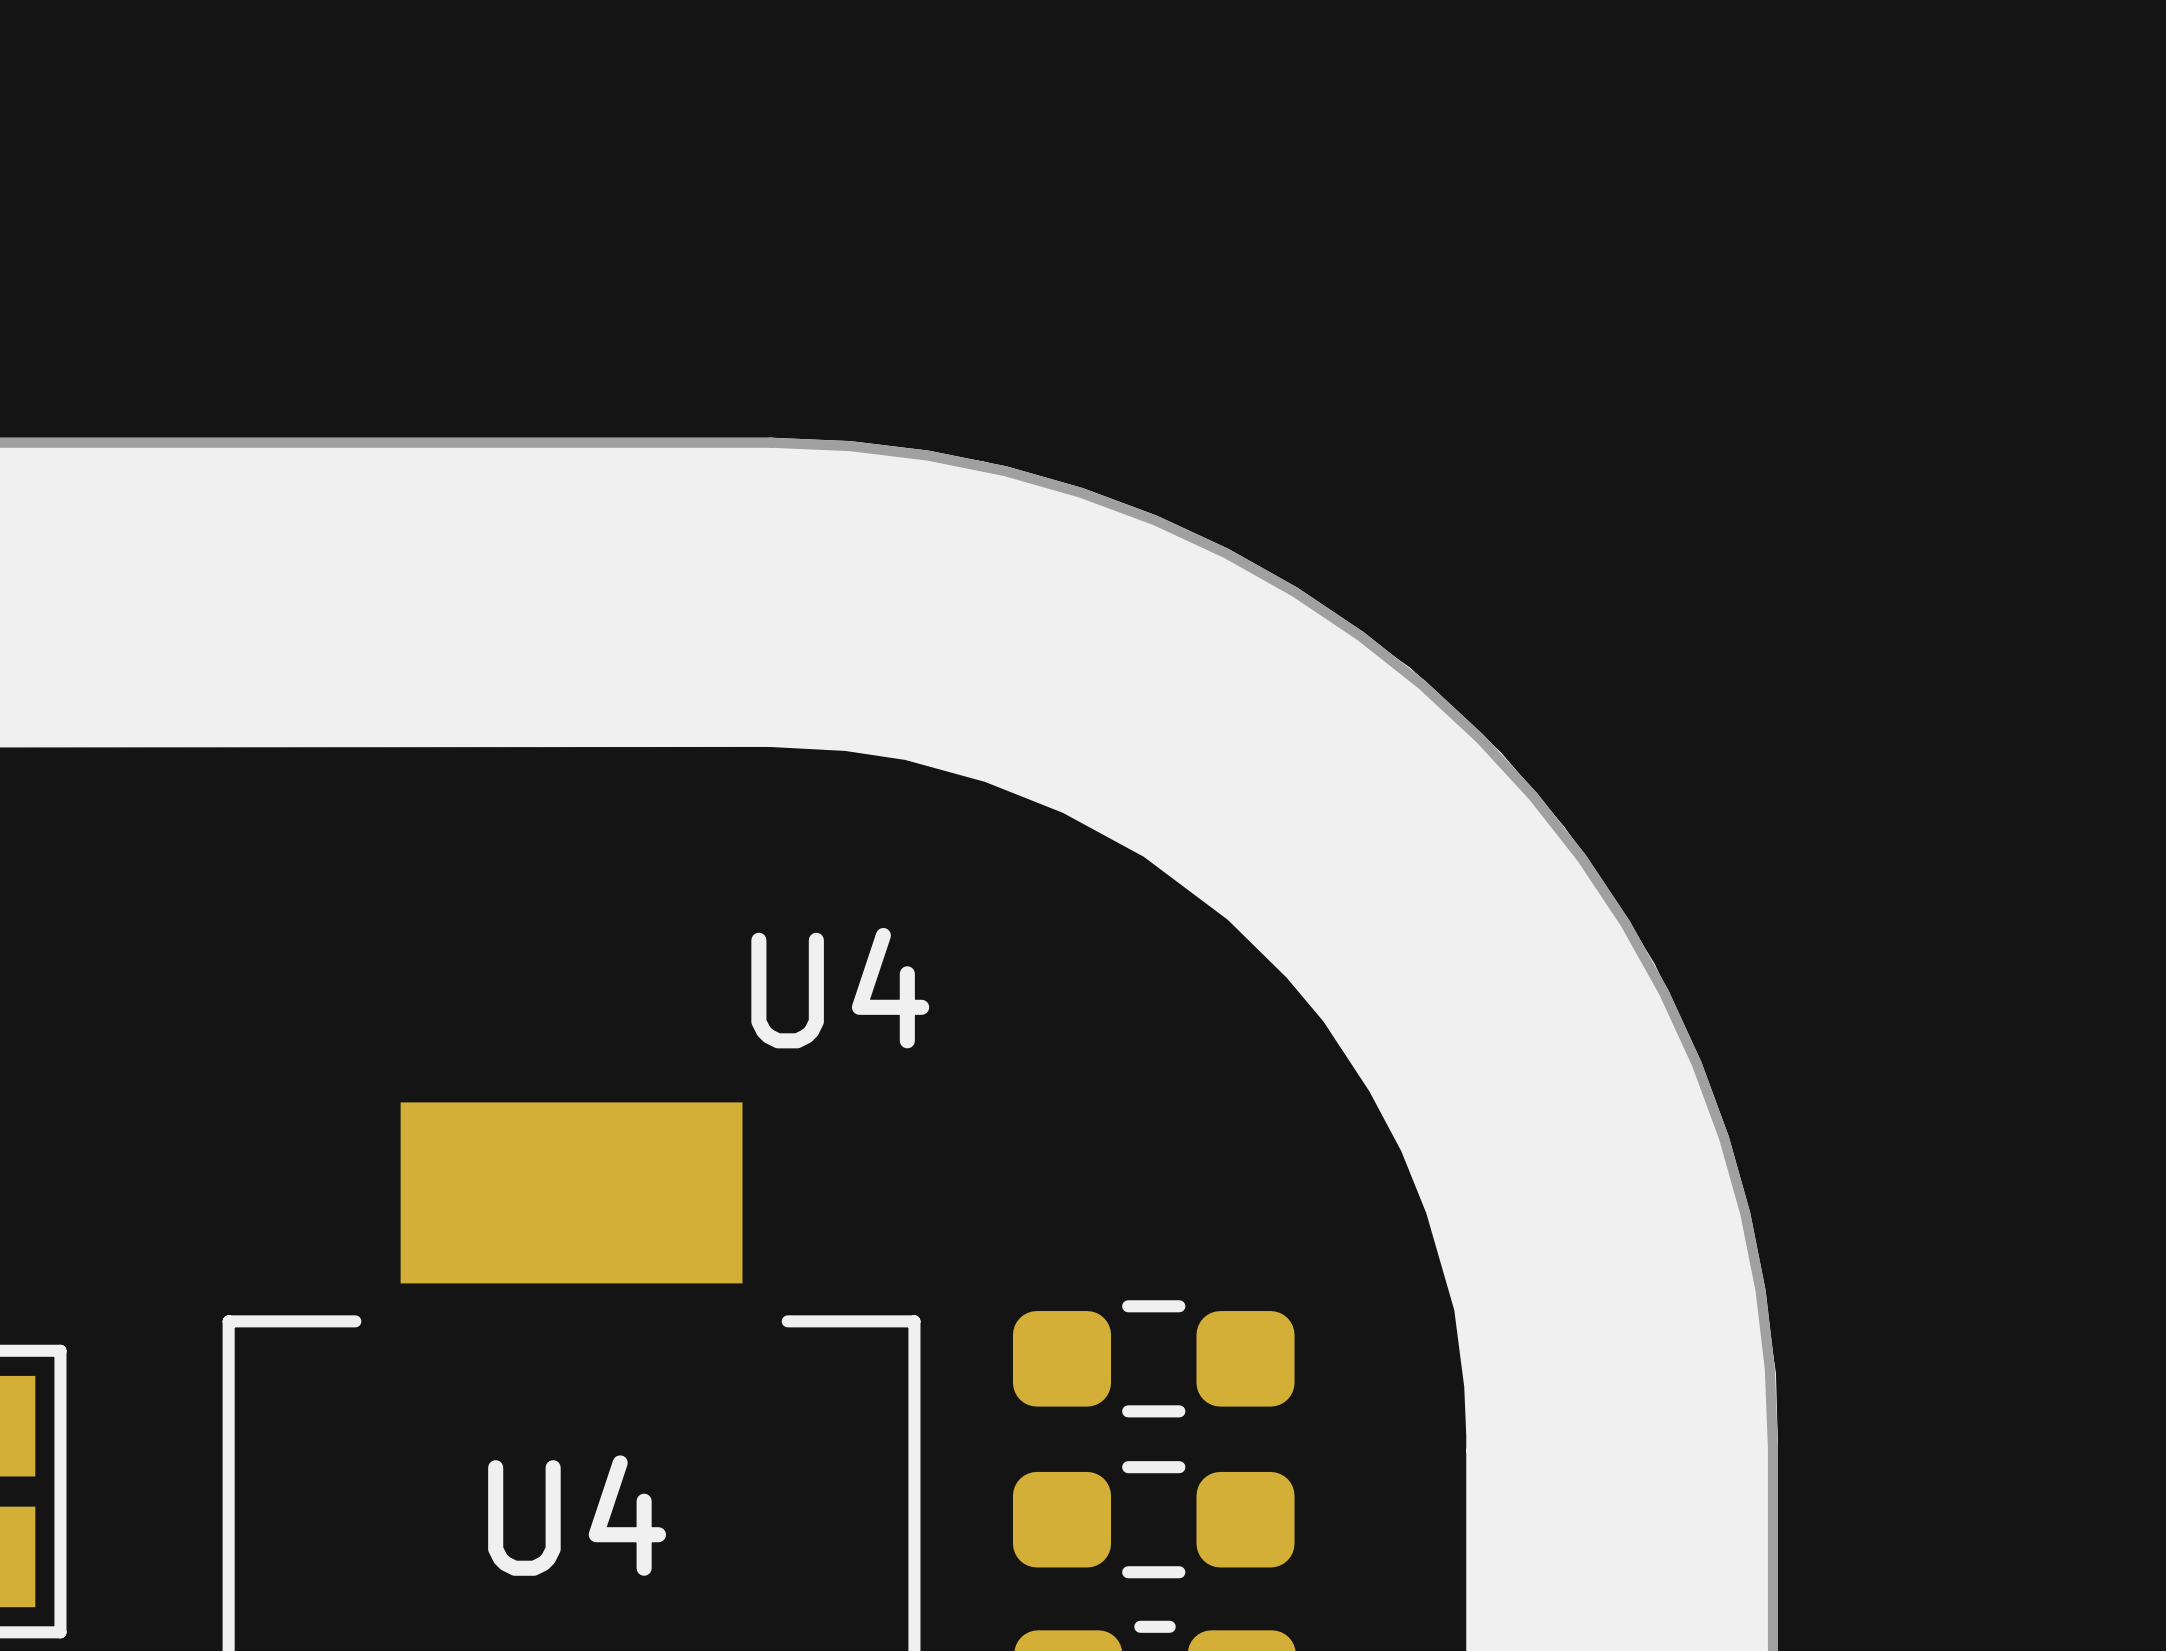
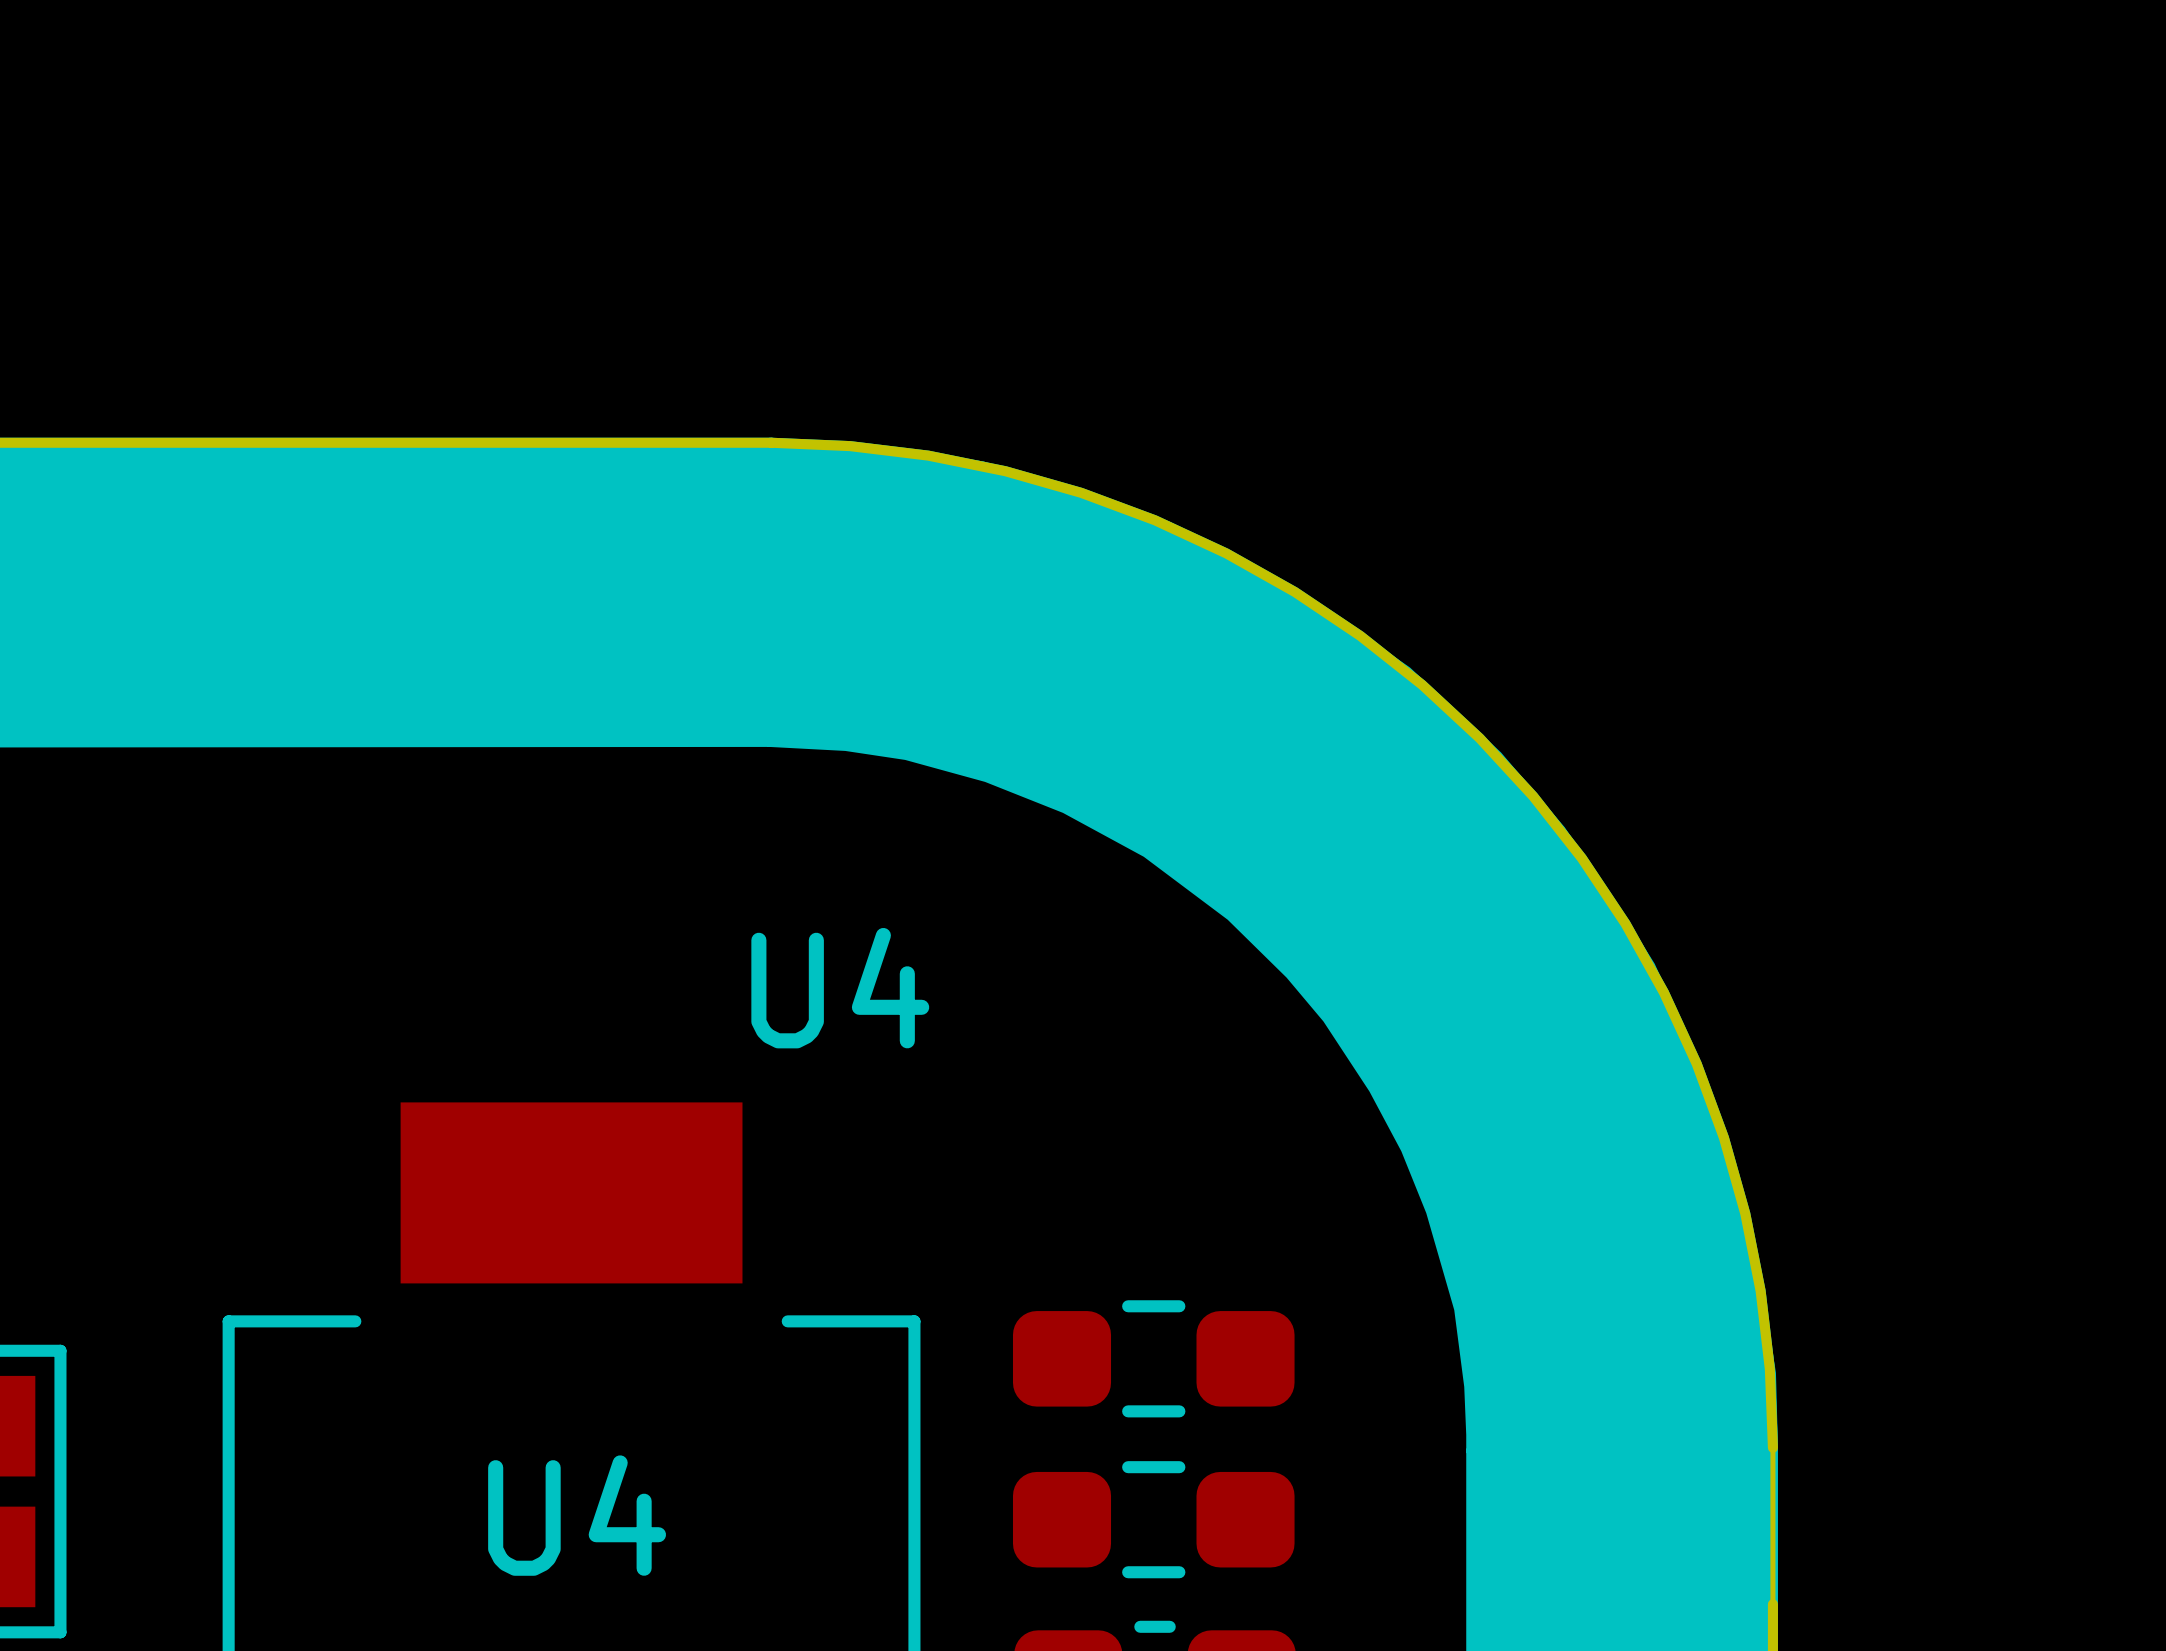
board edge width: thick (1772, 1447) (1772, 1604) -> thin (1772, 1447) (1772, 1604)

